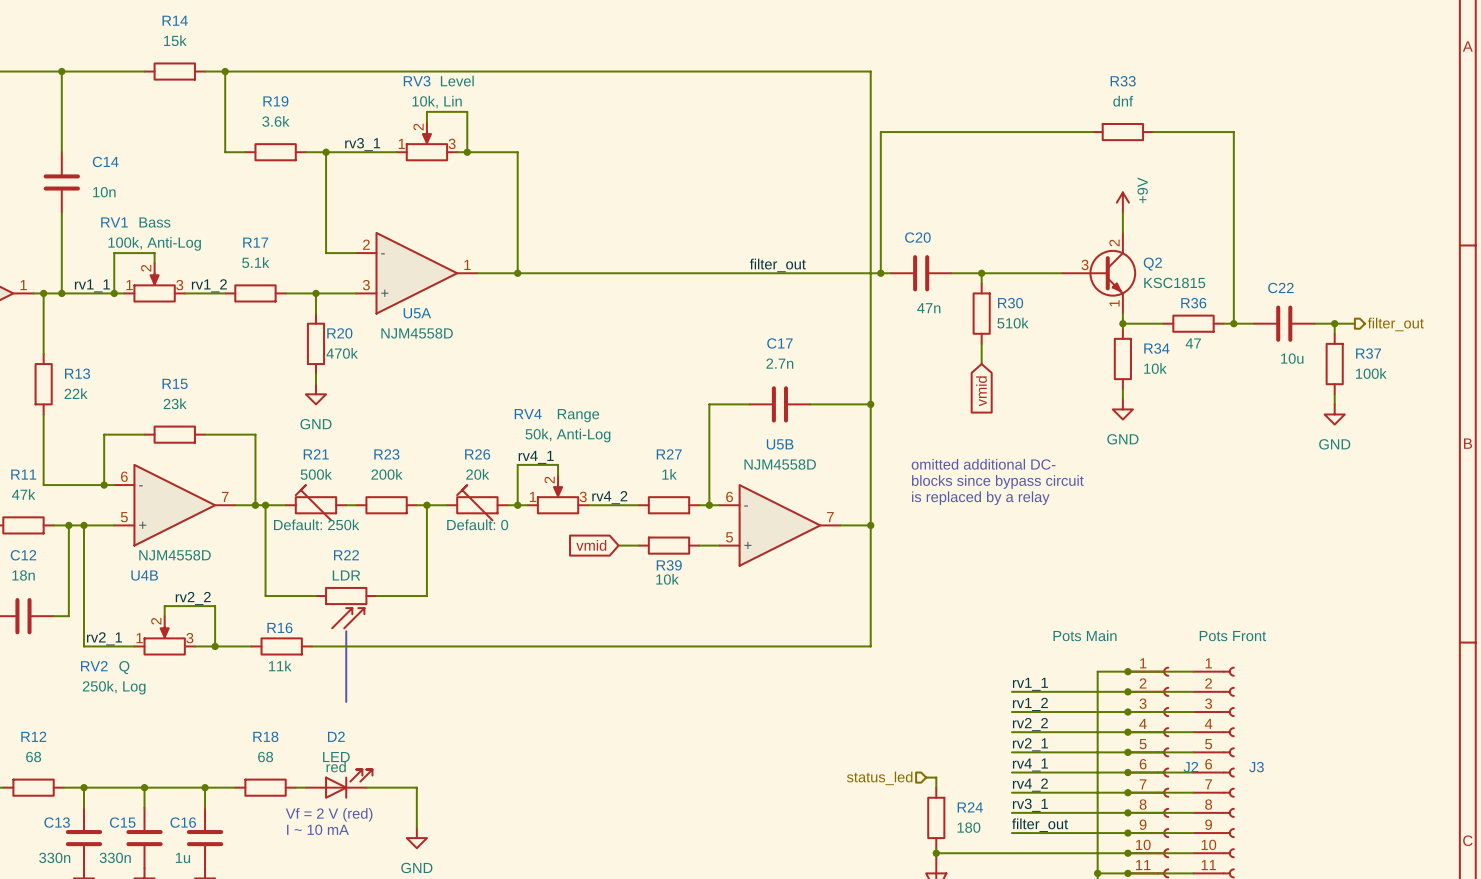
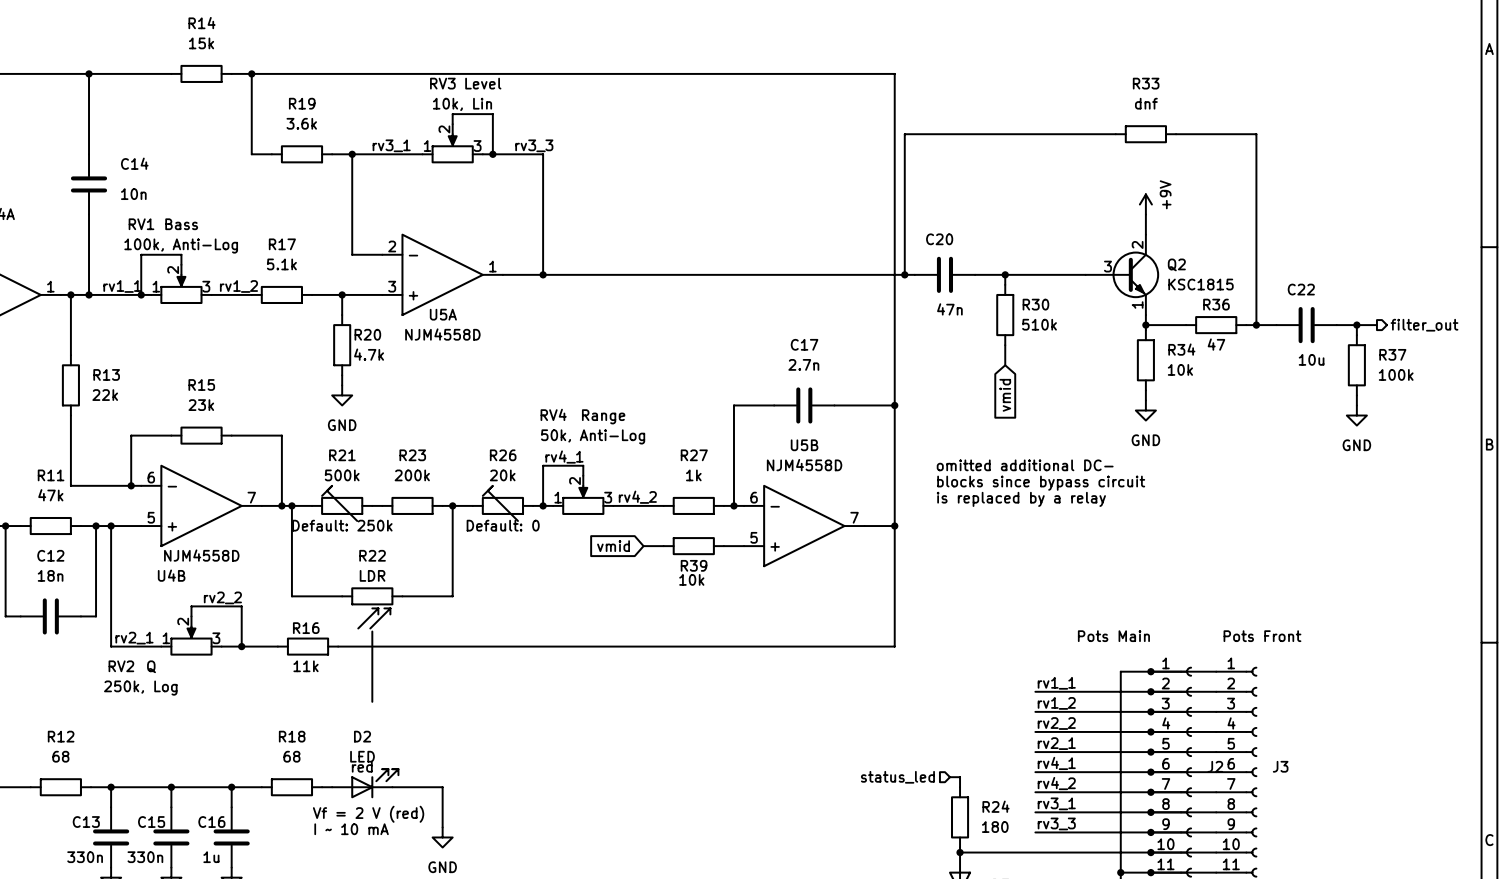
label: none -> rv3_3 (534, 145)
label: filter_out (777, 265) -> none
R20 value: 470k (342, 353) -> 4.7k (369, 354)
label: filter_out (1040, 825) -> rv3_3 (1056, 823)

